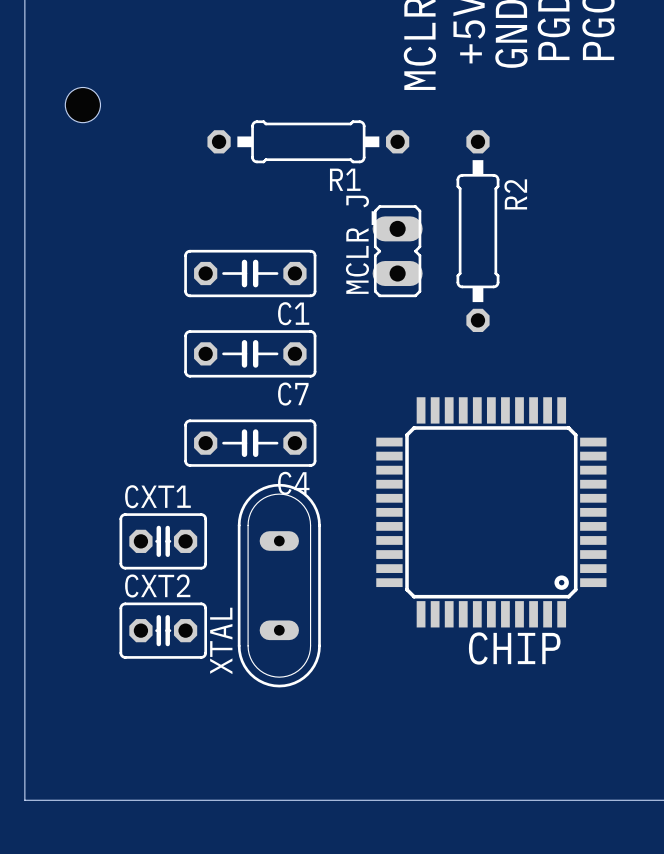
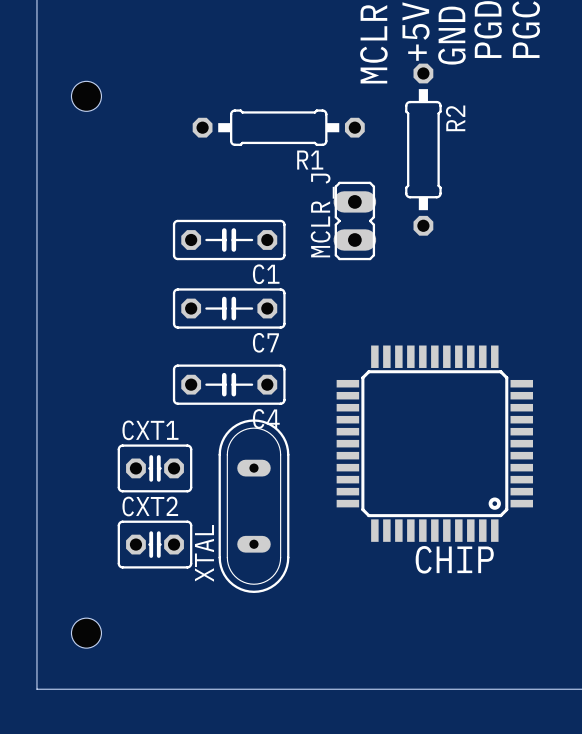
R2 position: (477, 231) -> (423, 149)
hole: none -> (86, 633)

